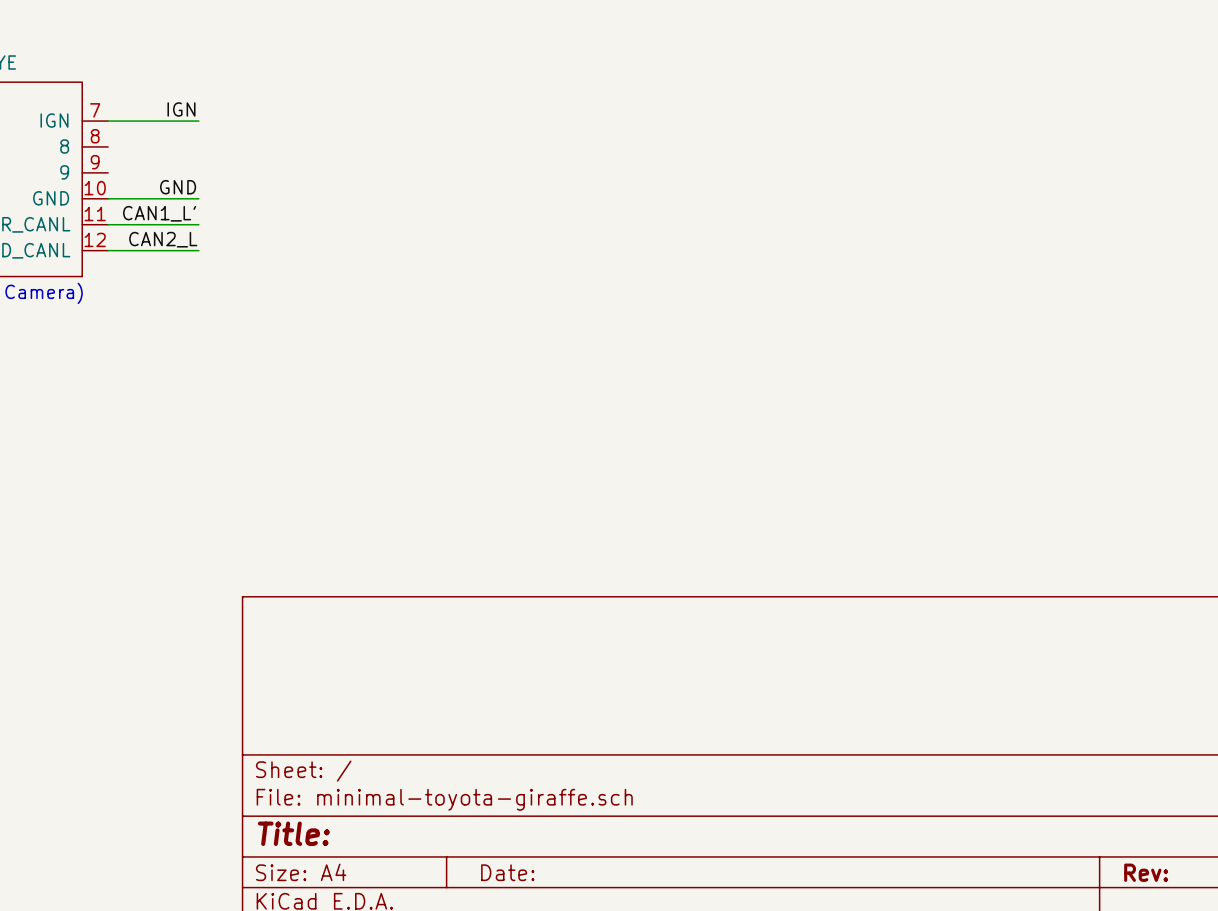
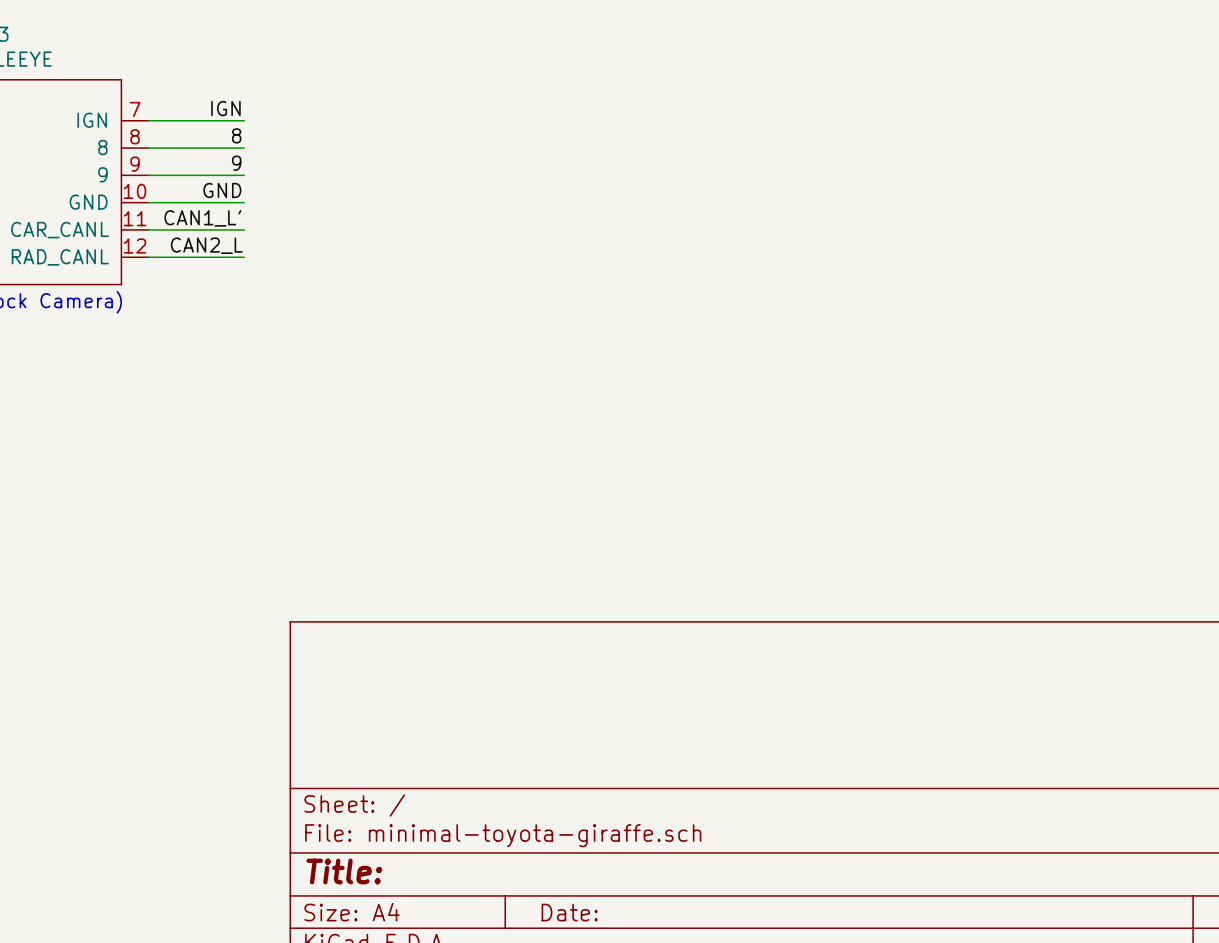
label: none -> 8 (236, 135)
wire: none -> (148, 148) (244, 148)
label: none -> 9 (236, 163)
wire: none -> (148, 175) (244, 175)

